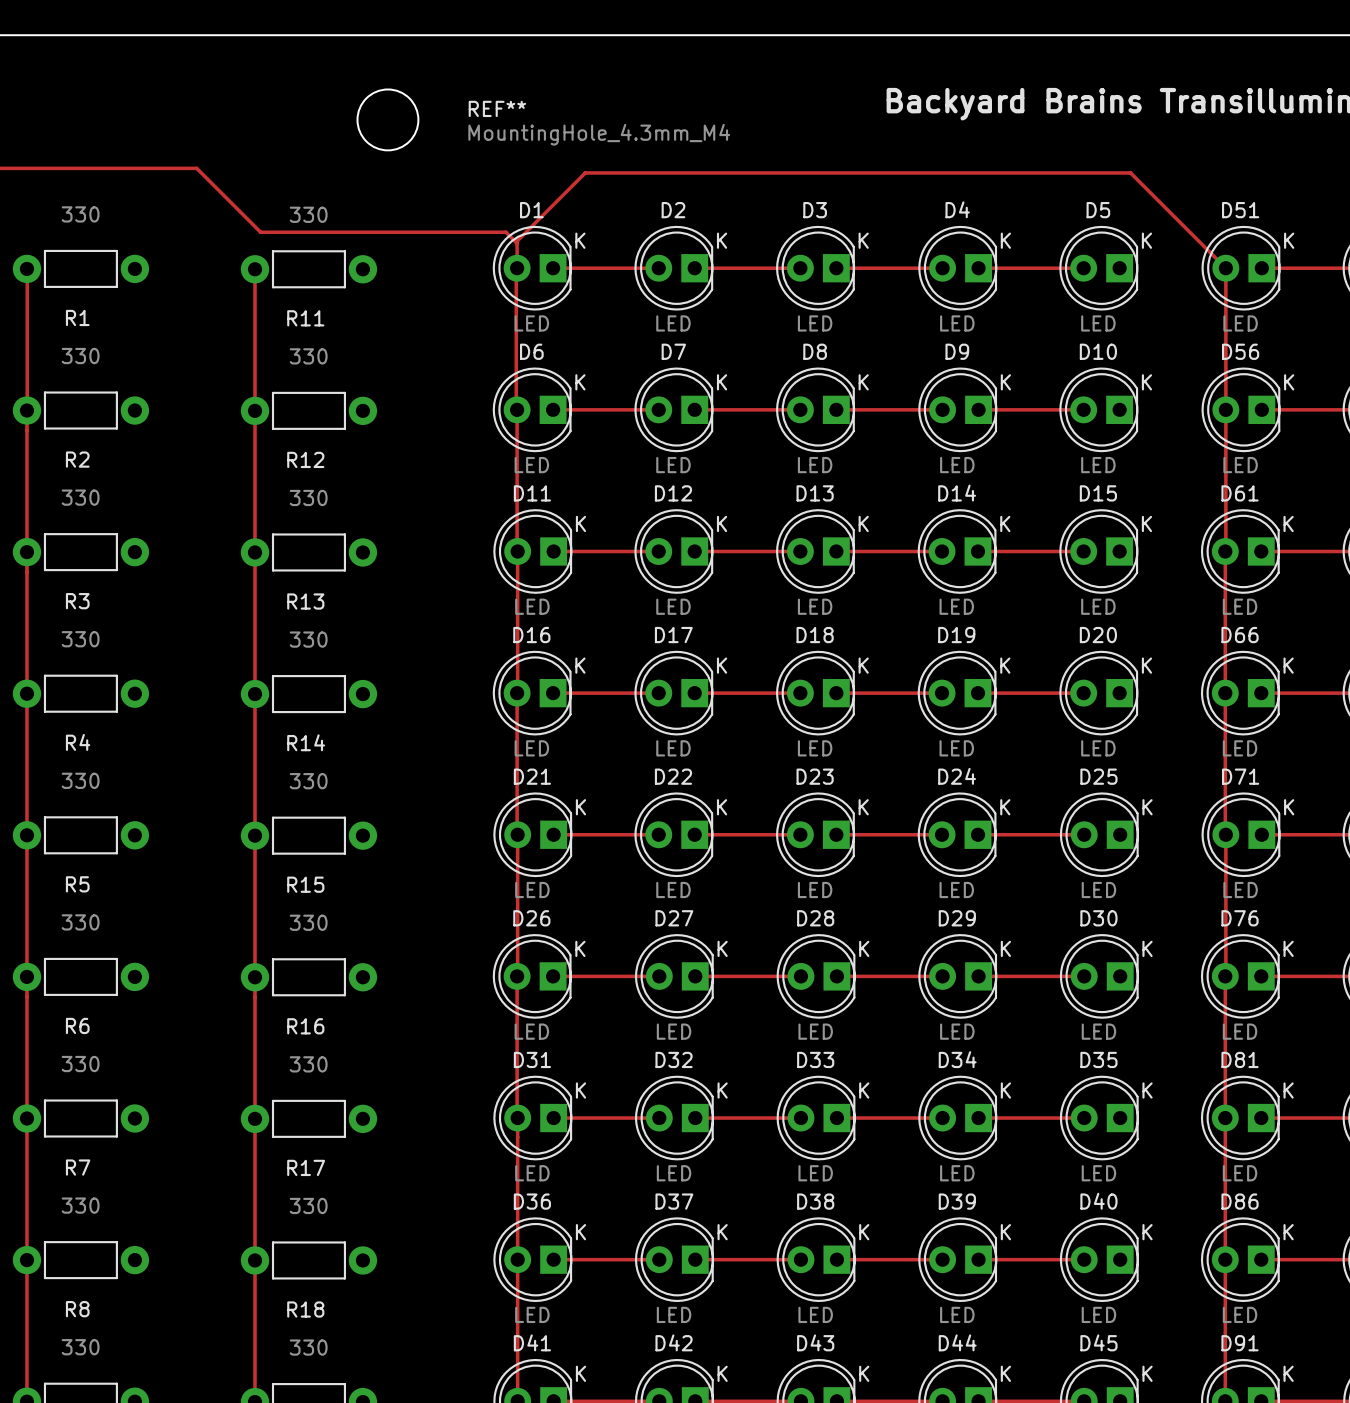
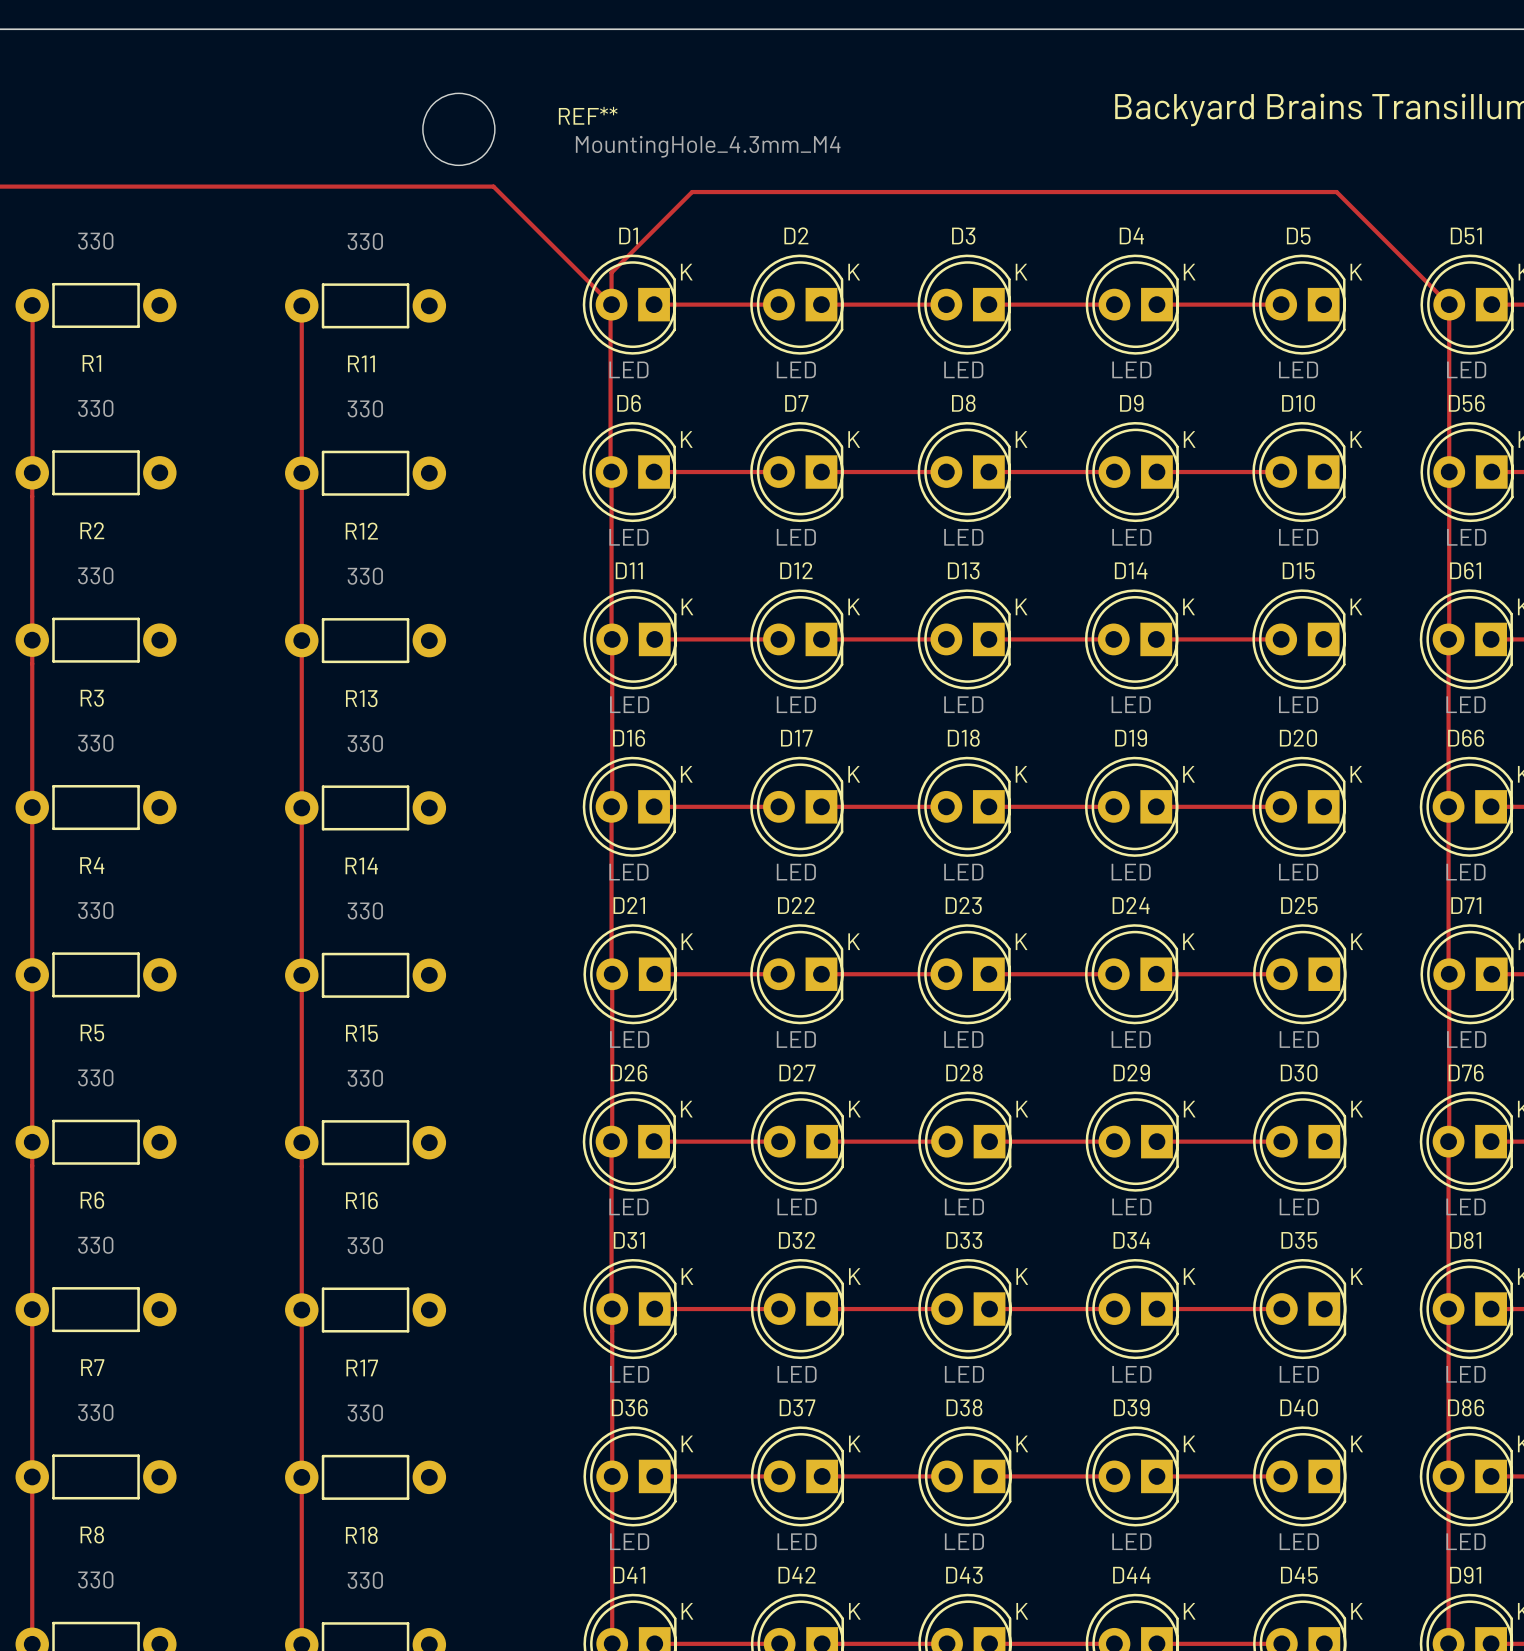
track: (196, 168) (260, 232) (505, 232) (517, 243) -> (232, 186) (493, 186) (611, 304)

